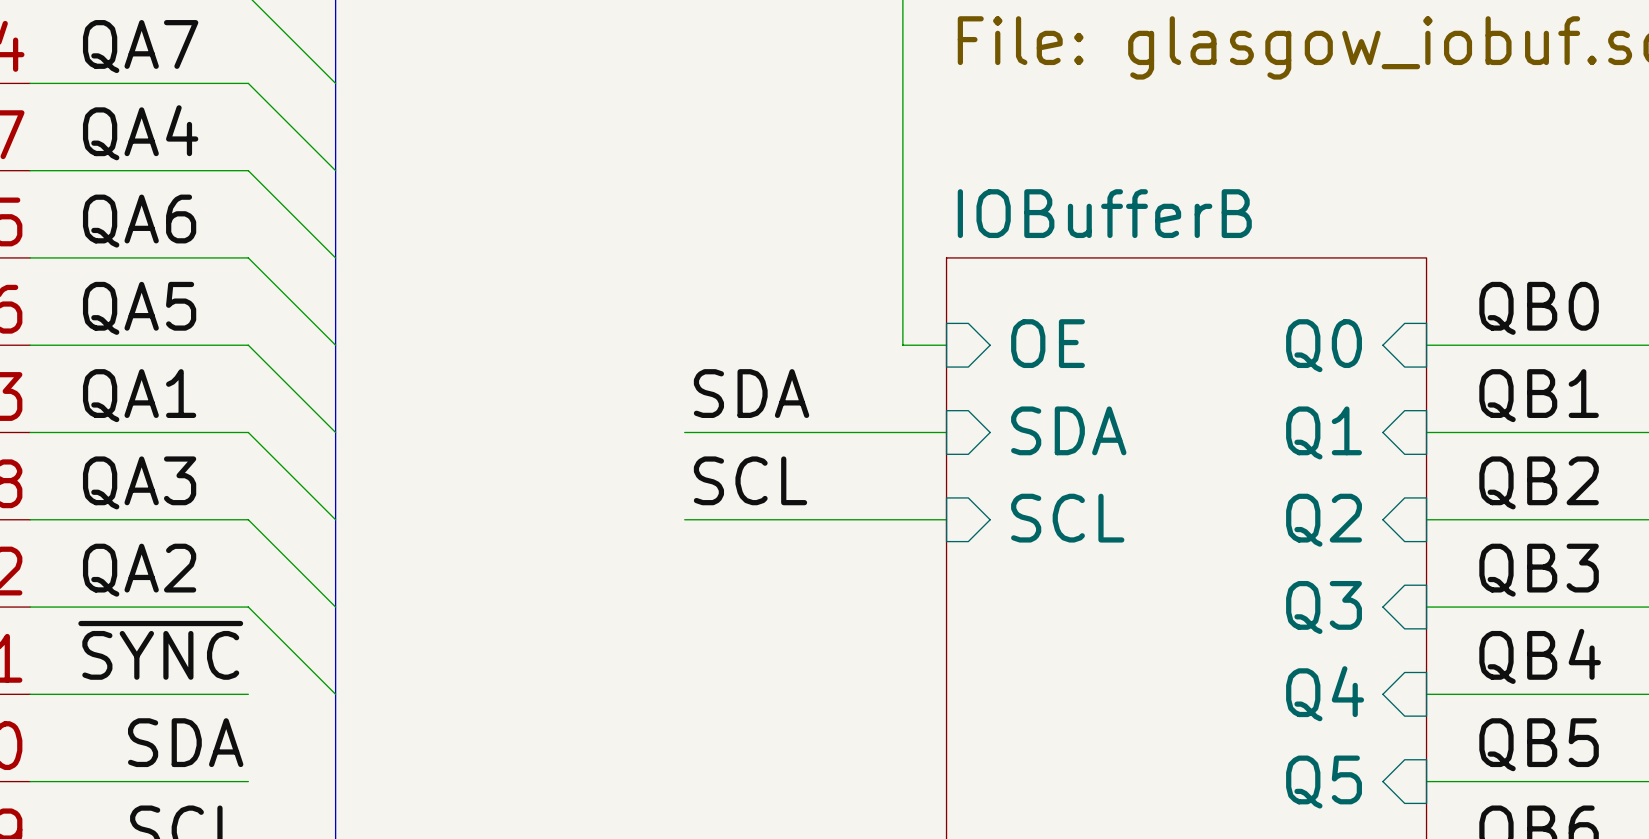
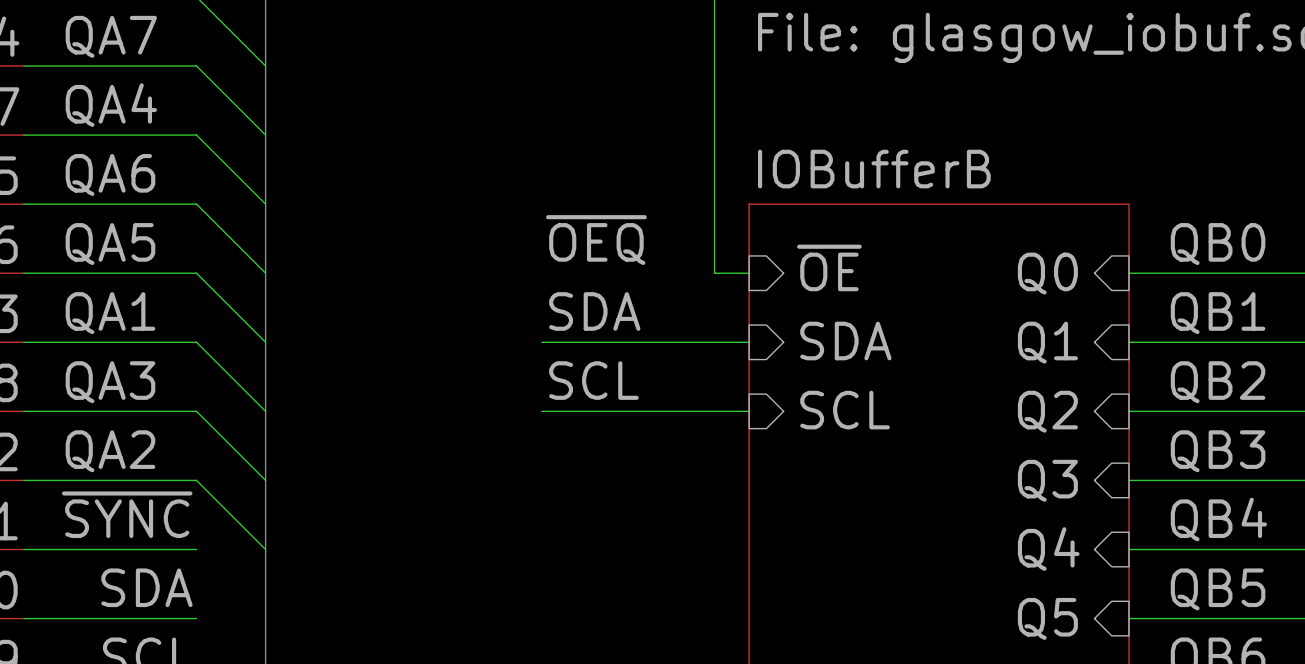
label: none -> ~{OEQ} (596, 240)
sheet pin: OE (1047, 343) -> ~{OE} (829, 267)

